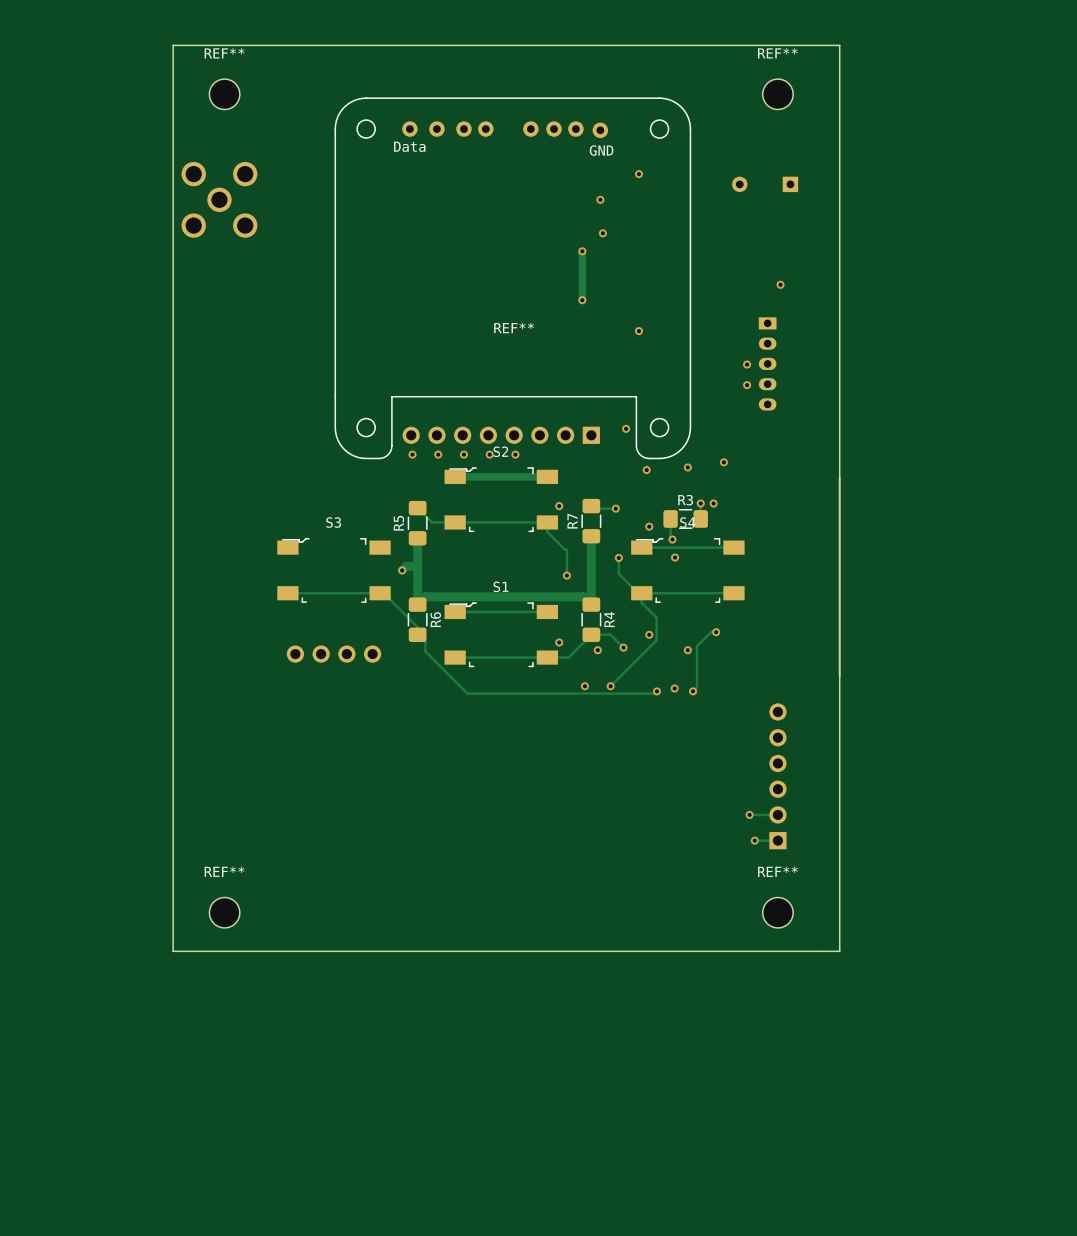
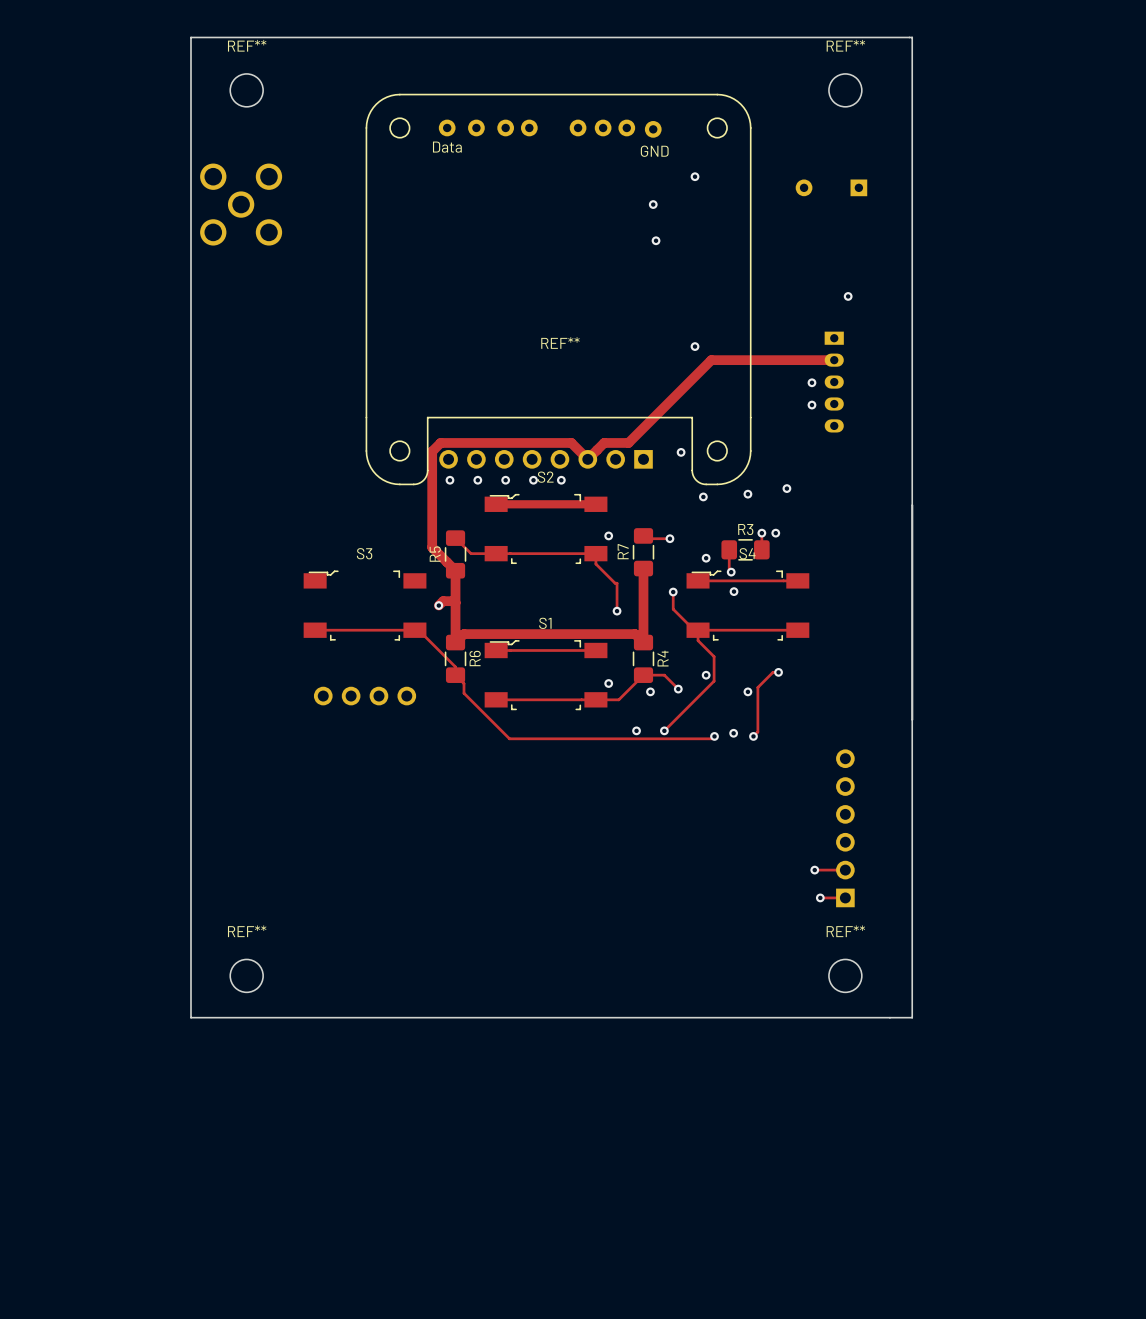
track: (582, 251) (582, 300) -> none
via: (582, 251) -> none
via: (582, 300) -> none
track: none -> (834, 360) (711, 360) (628, 442) (604, 442) (587, 459) (571, 442) (440, 442) (432, 451) (432, 547) (455, 570)

